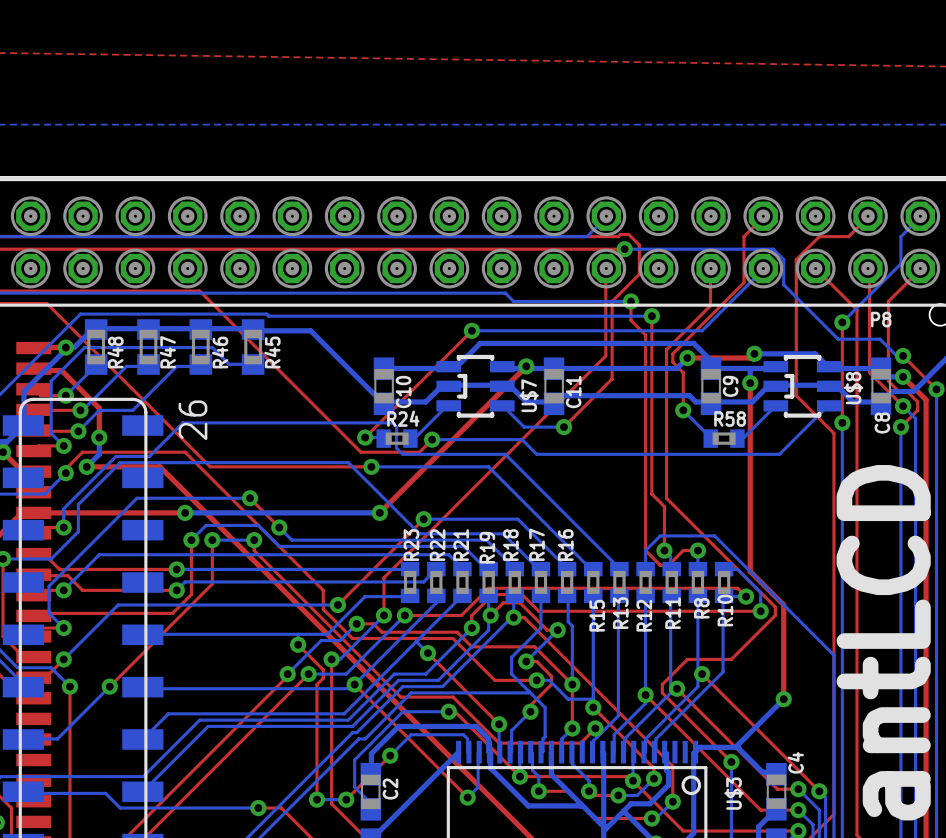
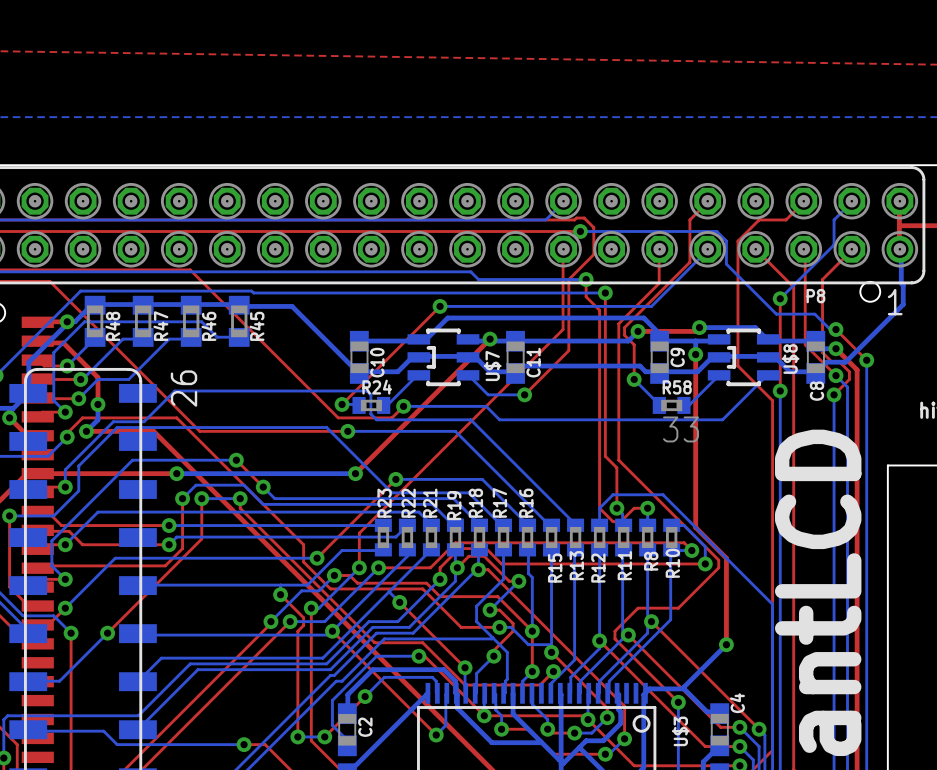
R58 value: none -> 33 (680, 429)

